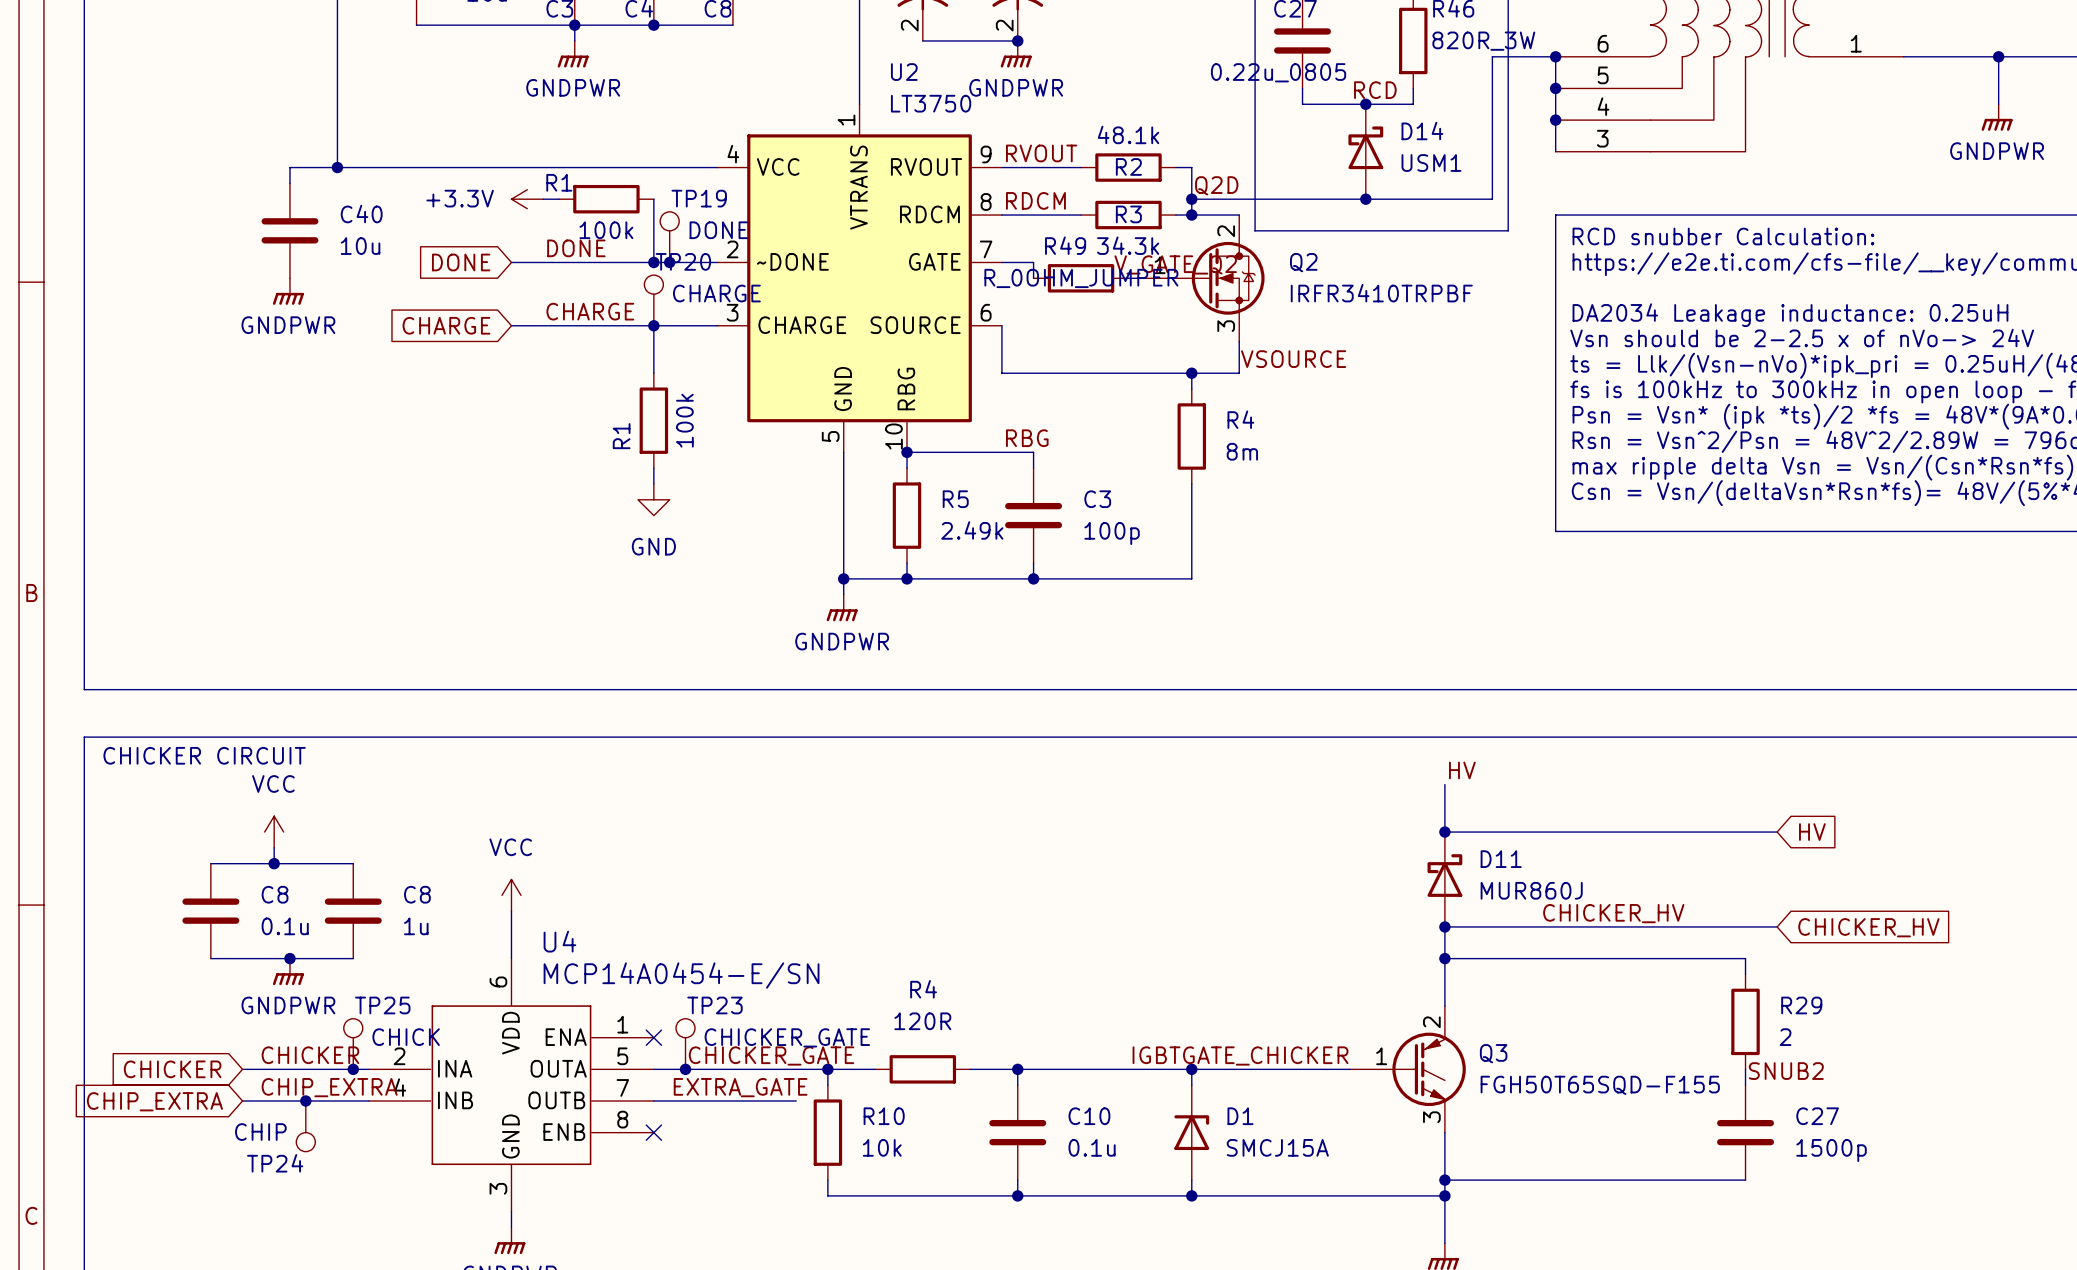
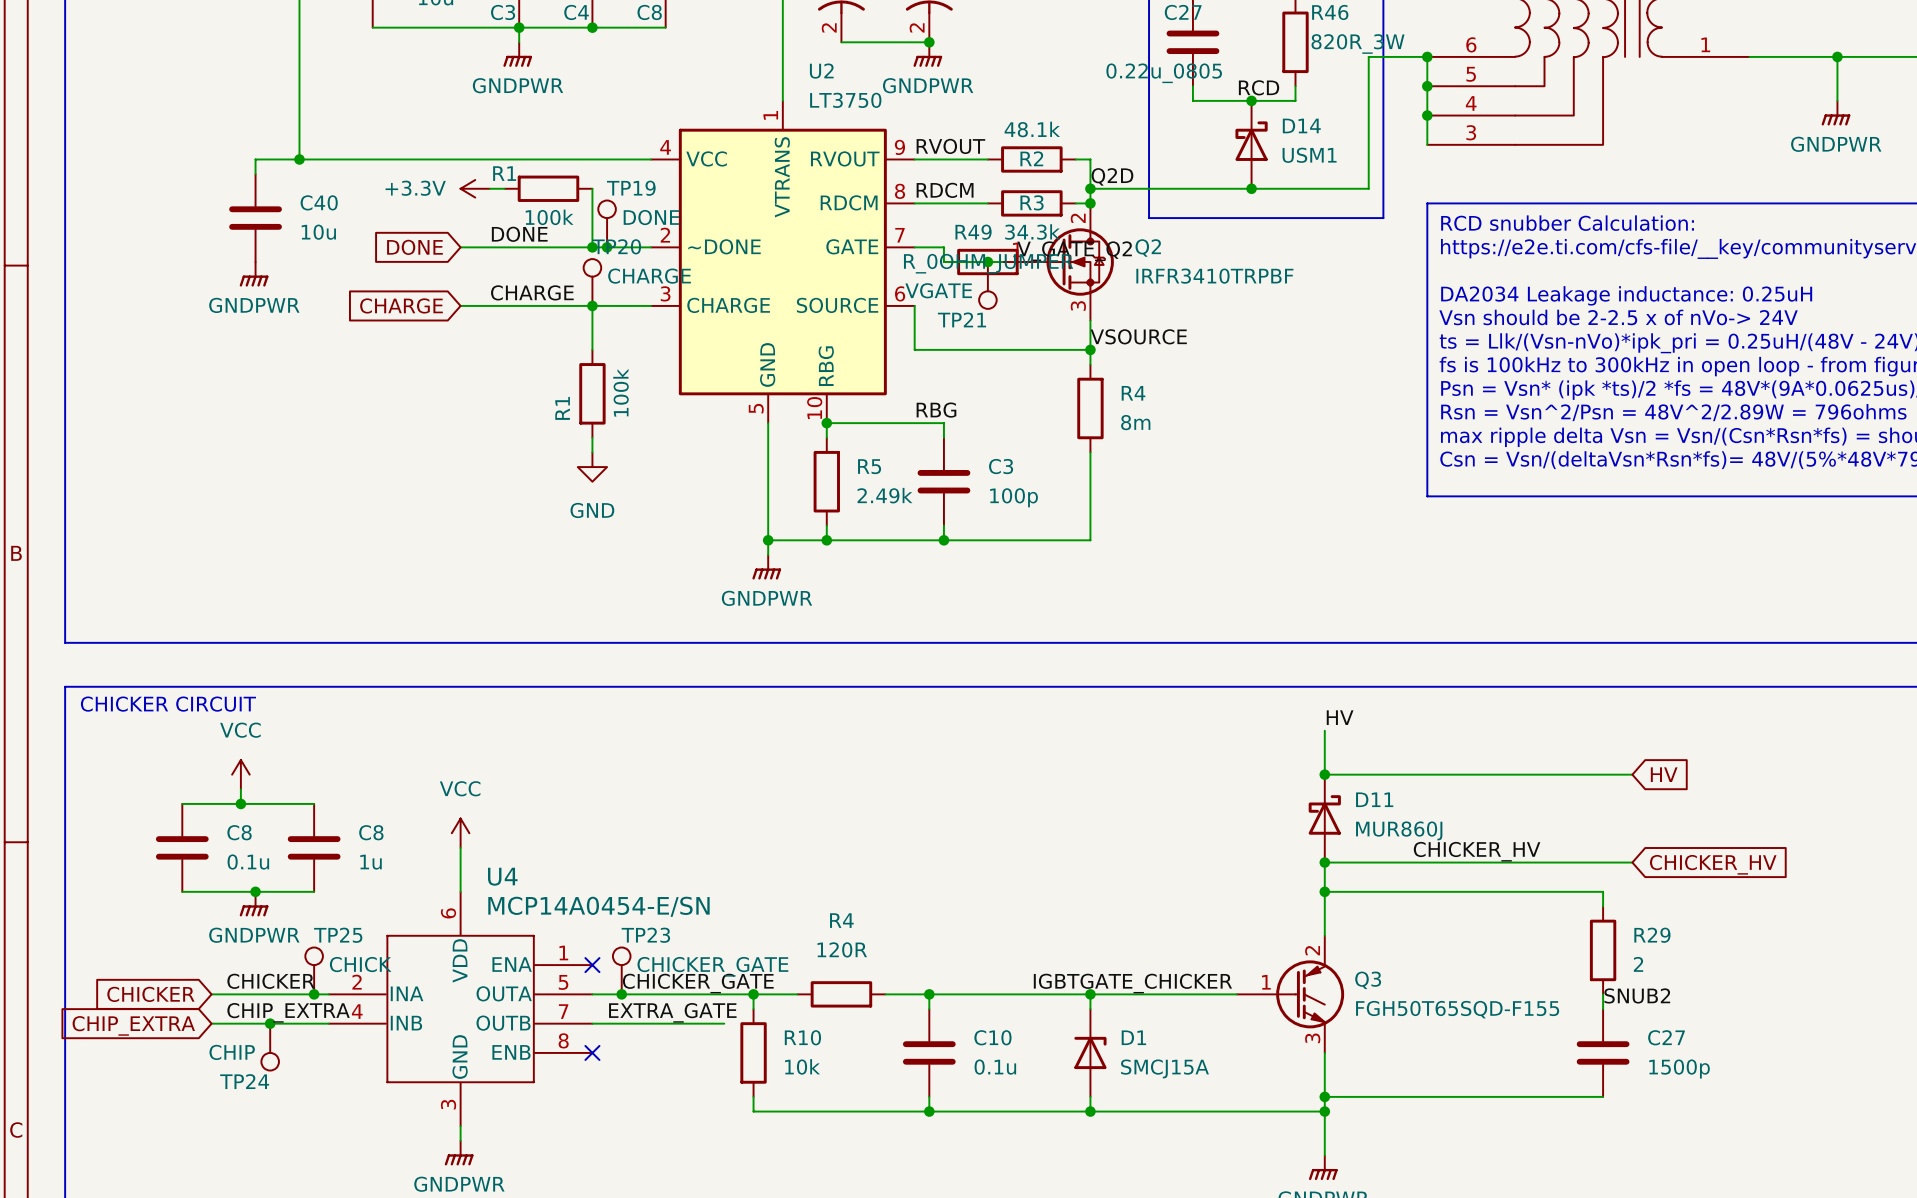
wire: (1191, 215) (1239, 215) -> none
wire: none -> (943, 262) (1002, 262)
junction: none -> (987, 262)
Q2 position: (1204, 278) -> (1058, 262)
TP21: none -> VGATE (987, 285)
wire: (1239, 341) (1239, 373) (1191, 373) -> (1090, 320) (1090, 349)
label position: VSOURCE (1293, 359) -> VSOURCE (1138, 336)

